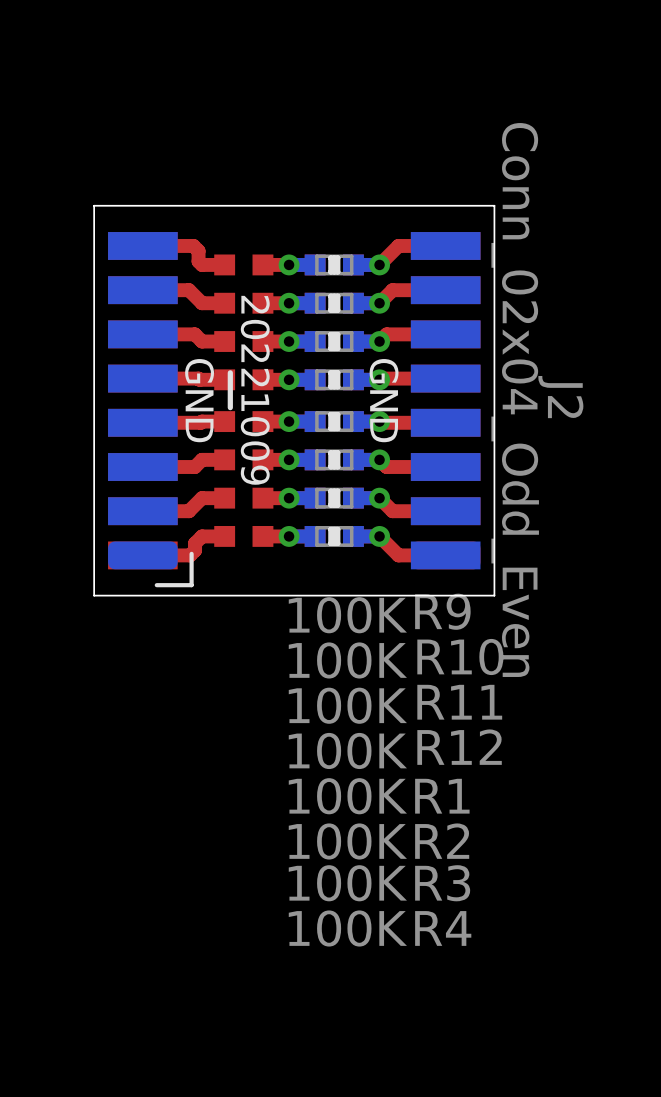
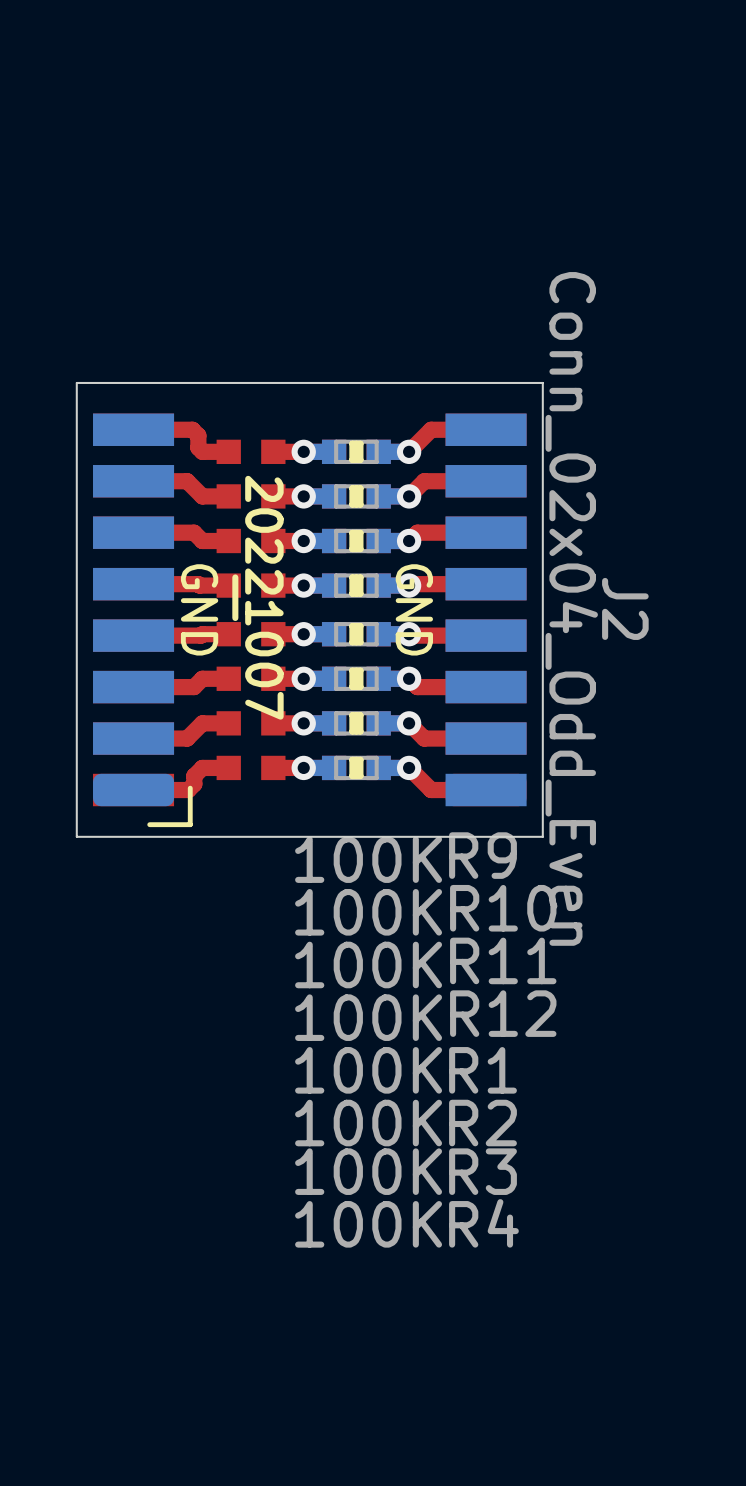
drawing shape: [227, 295, 270, 485] -> [232, 475, 284, 720]

